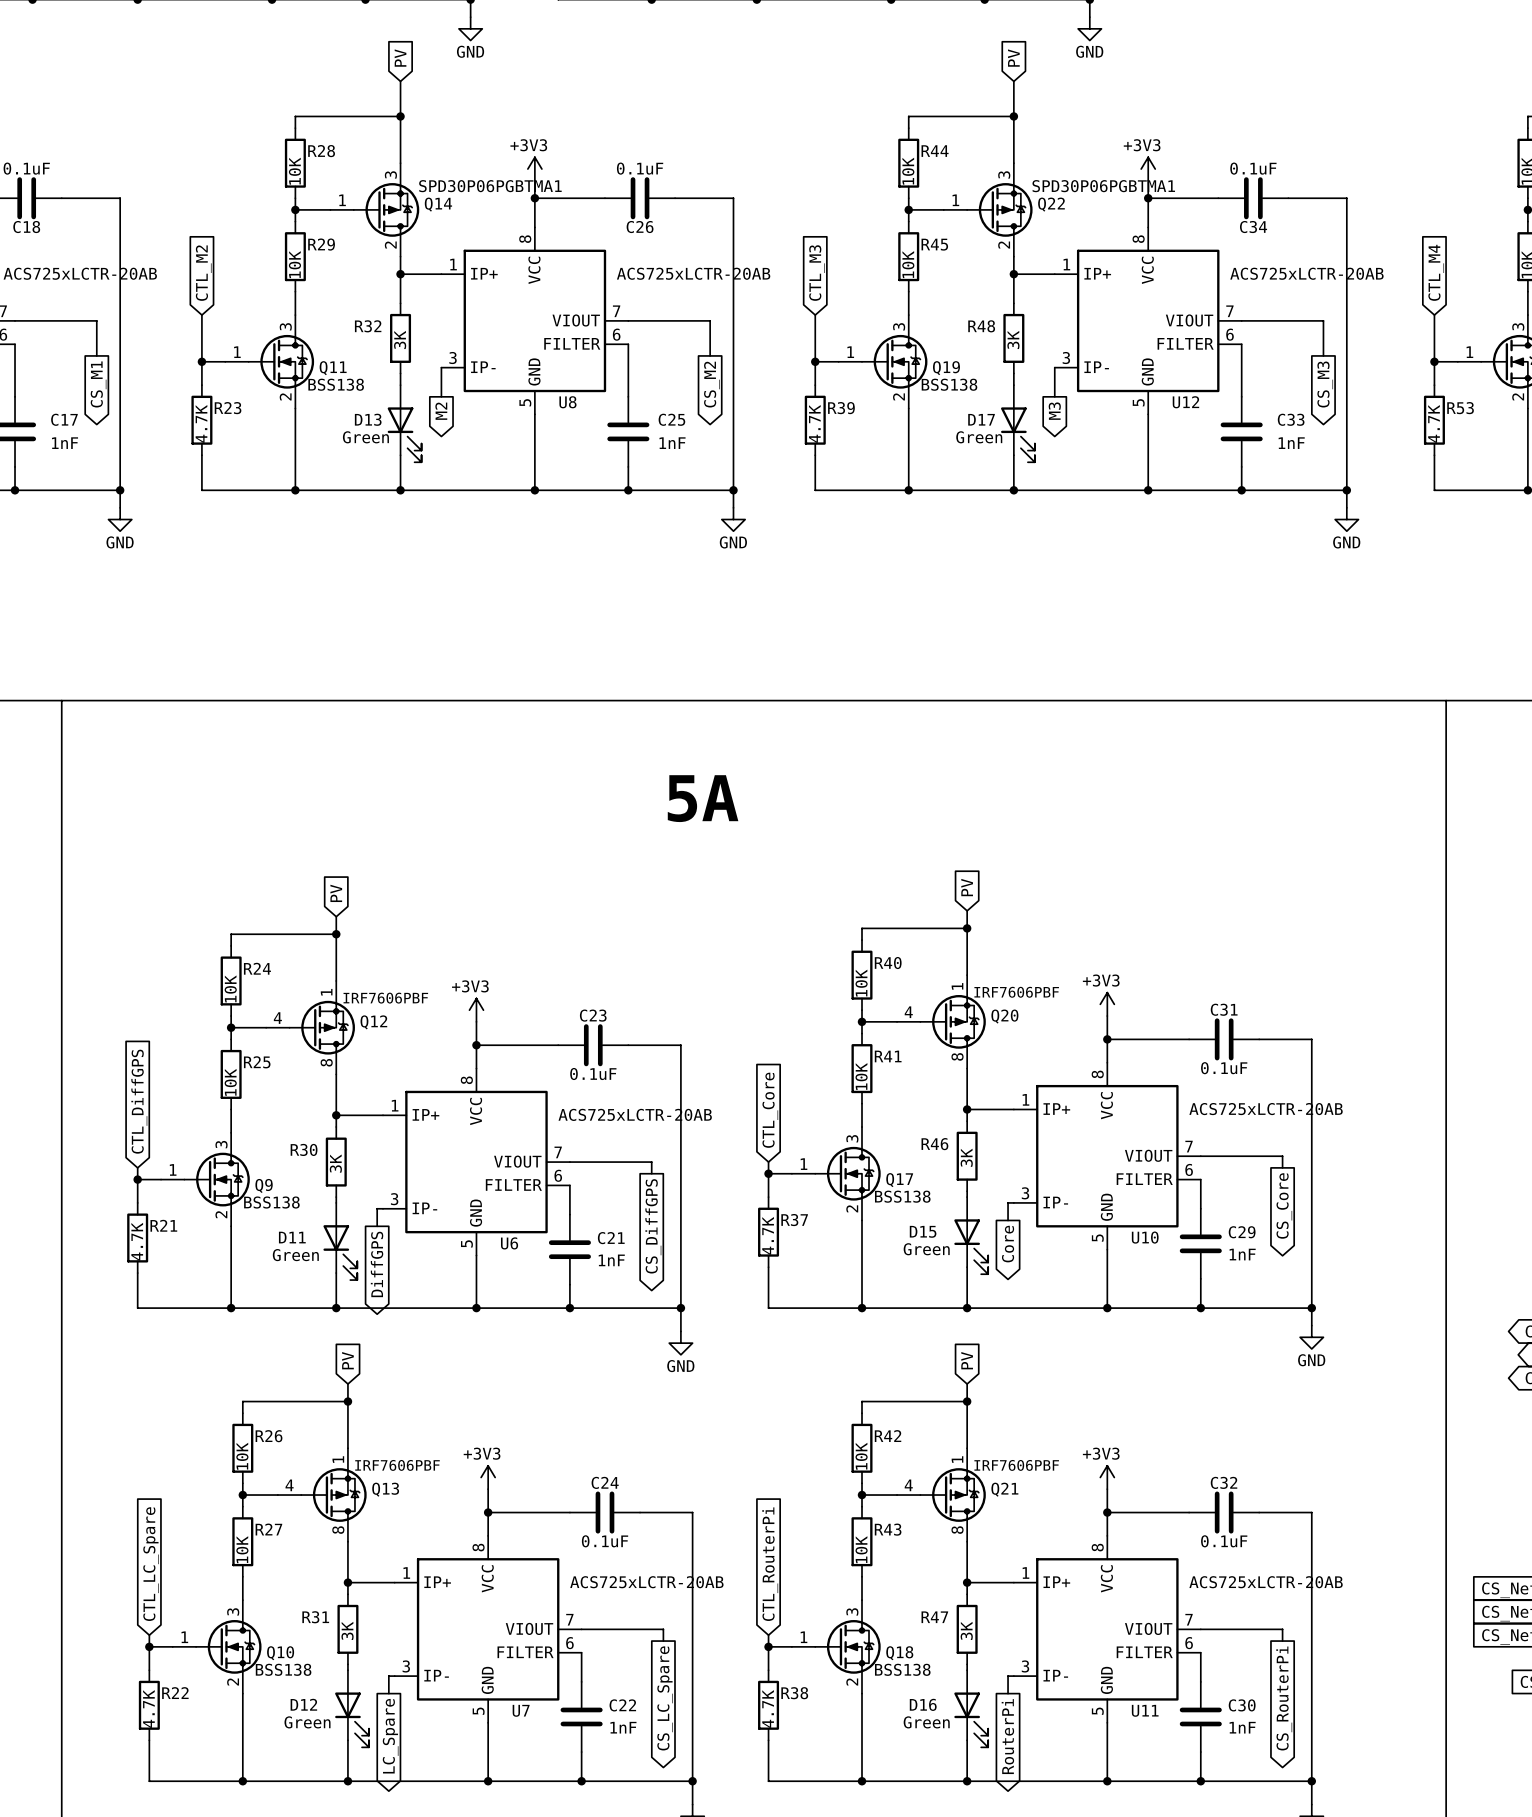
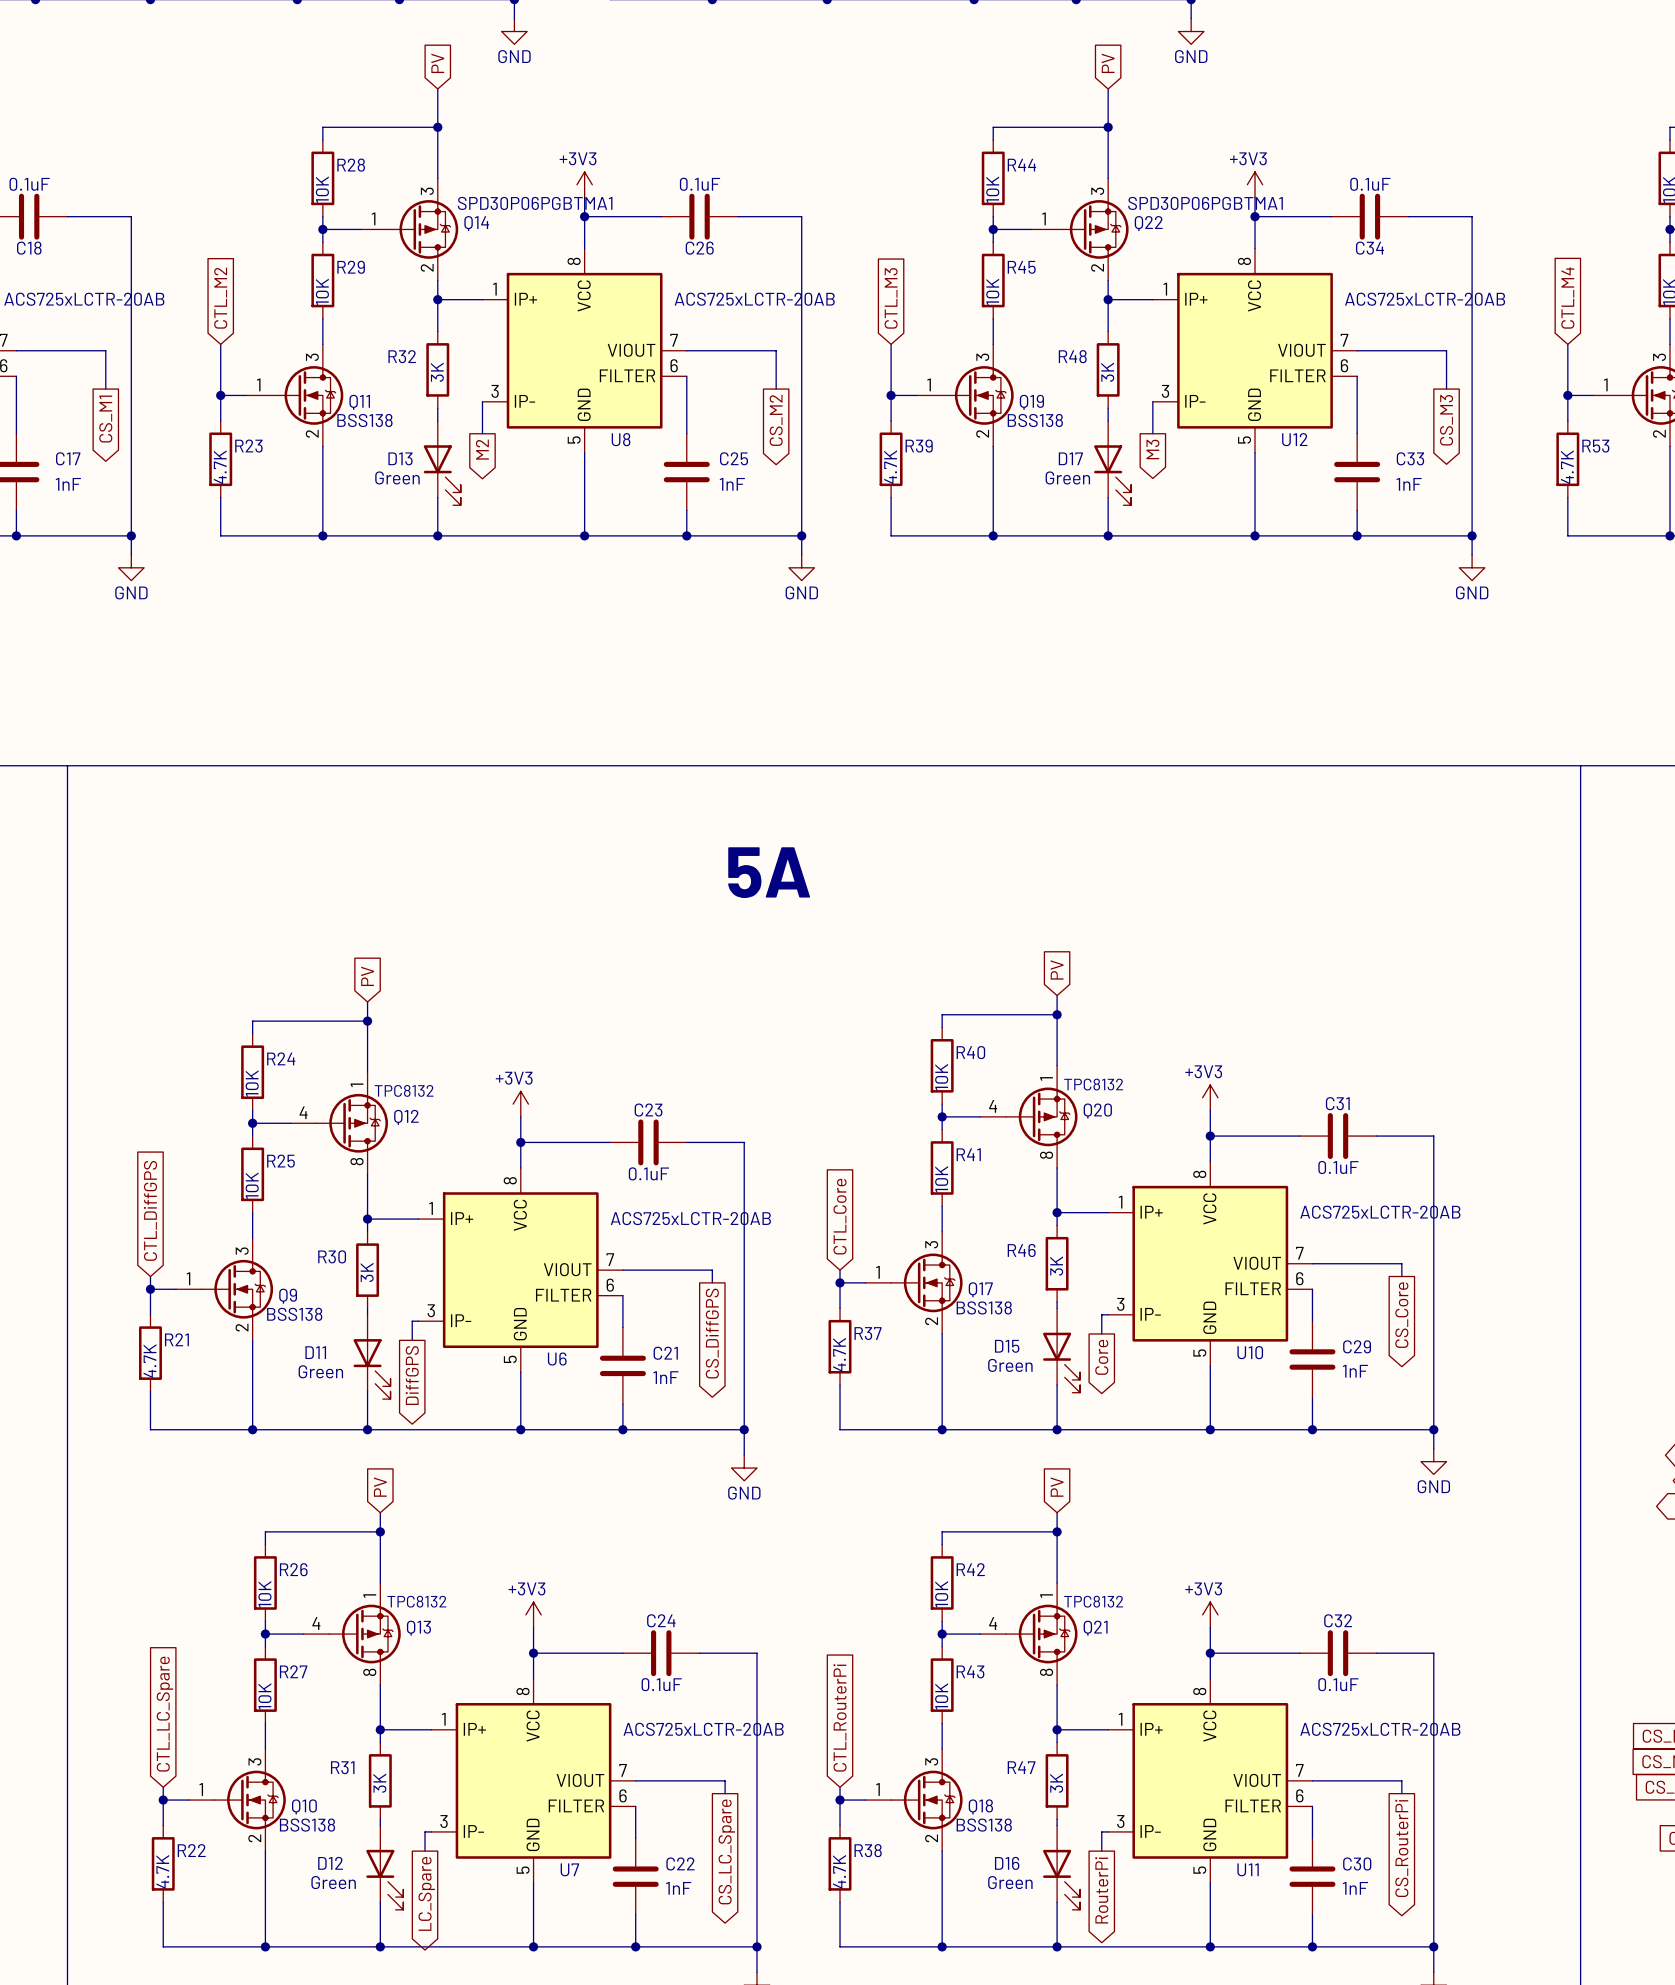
Q20 value: IRF7606PBF (1016, 992) -> TPC8132 (1093, 1084)
Q12 value: IRF7606PBF (385, 998) -> TPC8132 (404, 1090)
Q13 value: IRF7606PBF (397, 1465) -> TPC8132 (416, 1601)
Q21 value: IRF7606PBF (1016, 1465) -> TPC8132 (1093, 1601)

